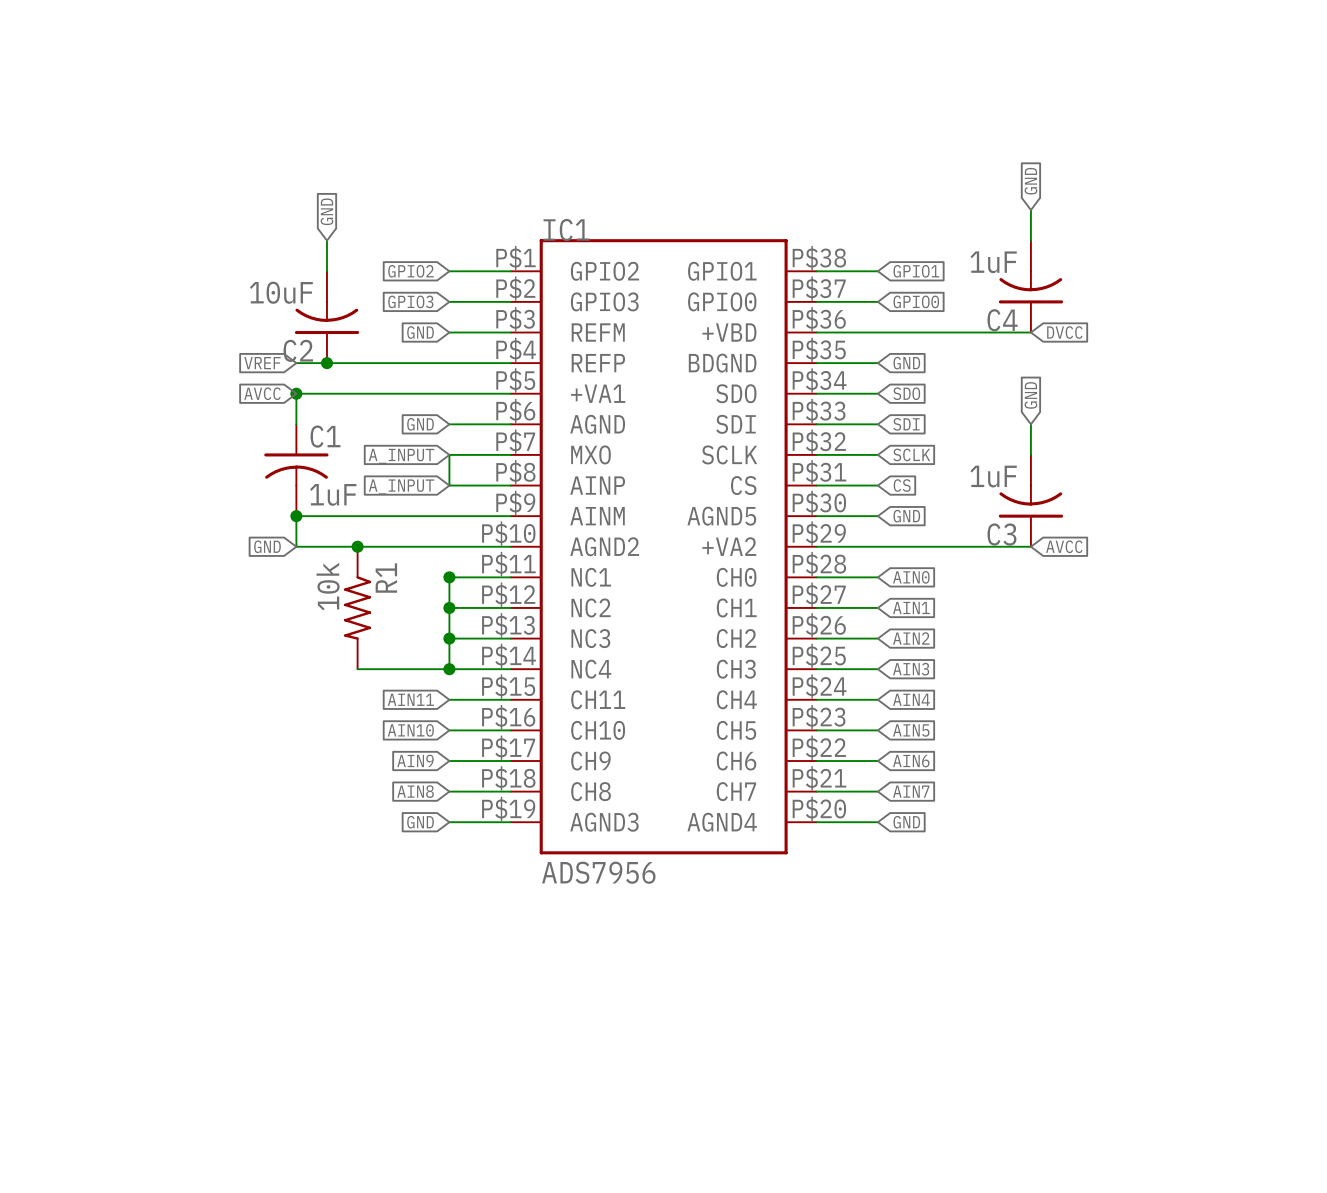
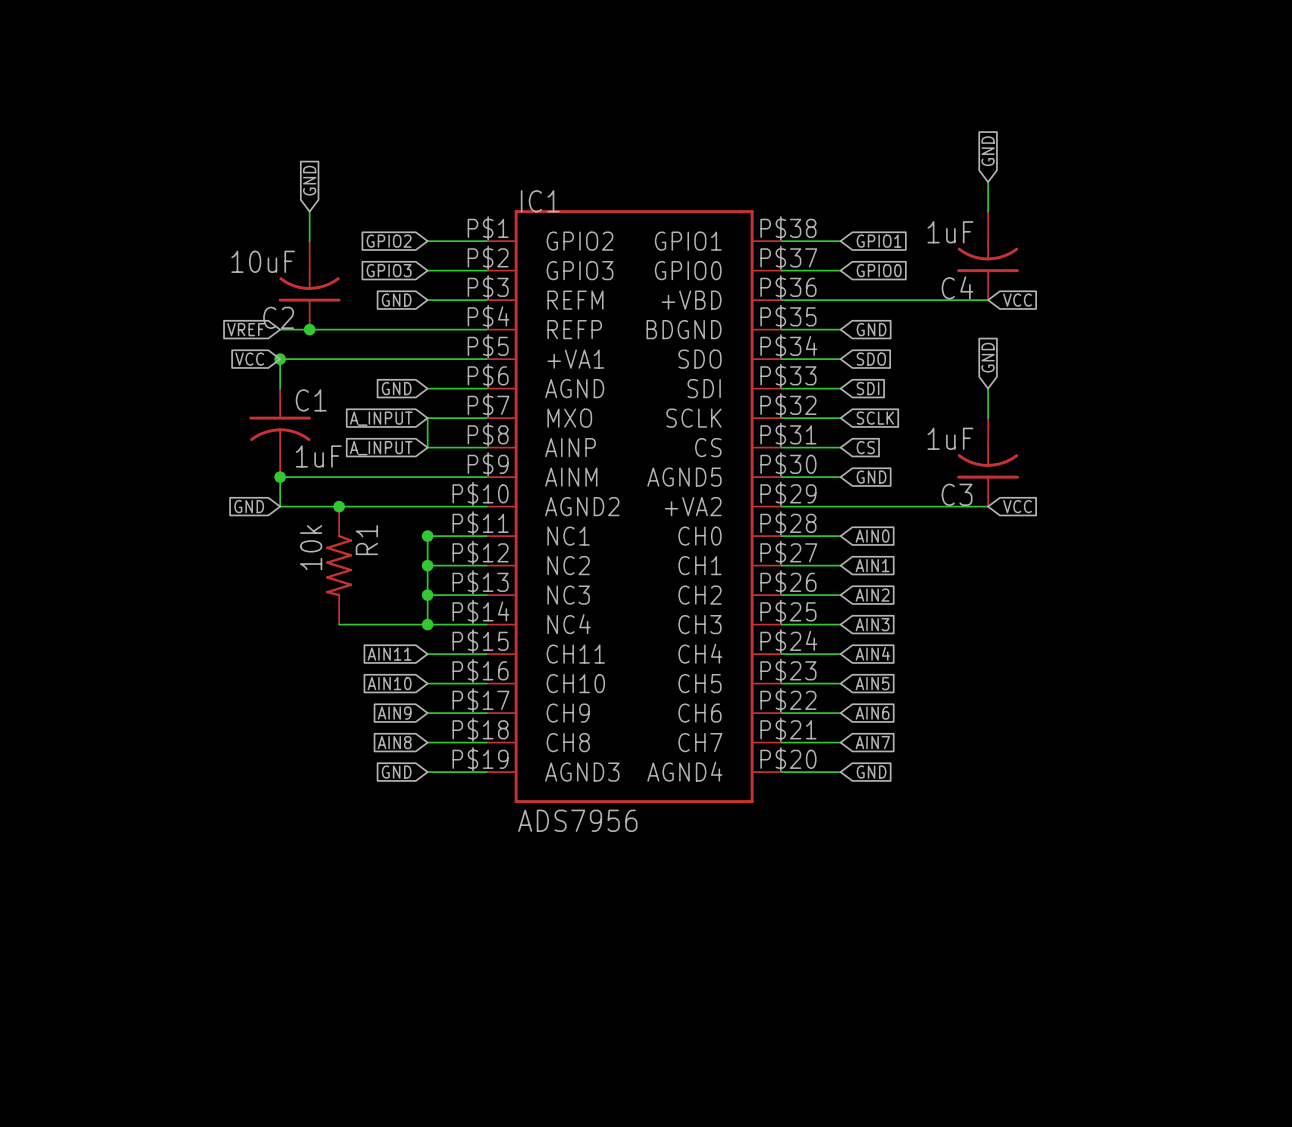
global label: DVCC (1064, 332) -> VCC (1017, 300)
global label: AVCC (262, 393) -> VCC (249, 359)
global label: AVCC (1064, 546) -> VCC (1017, 506)

